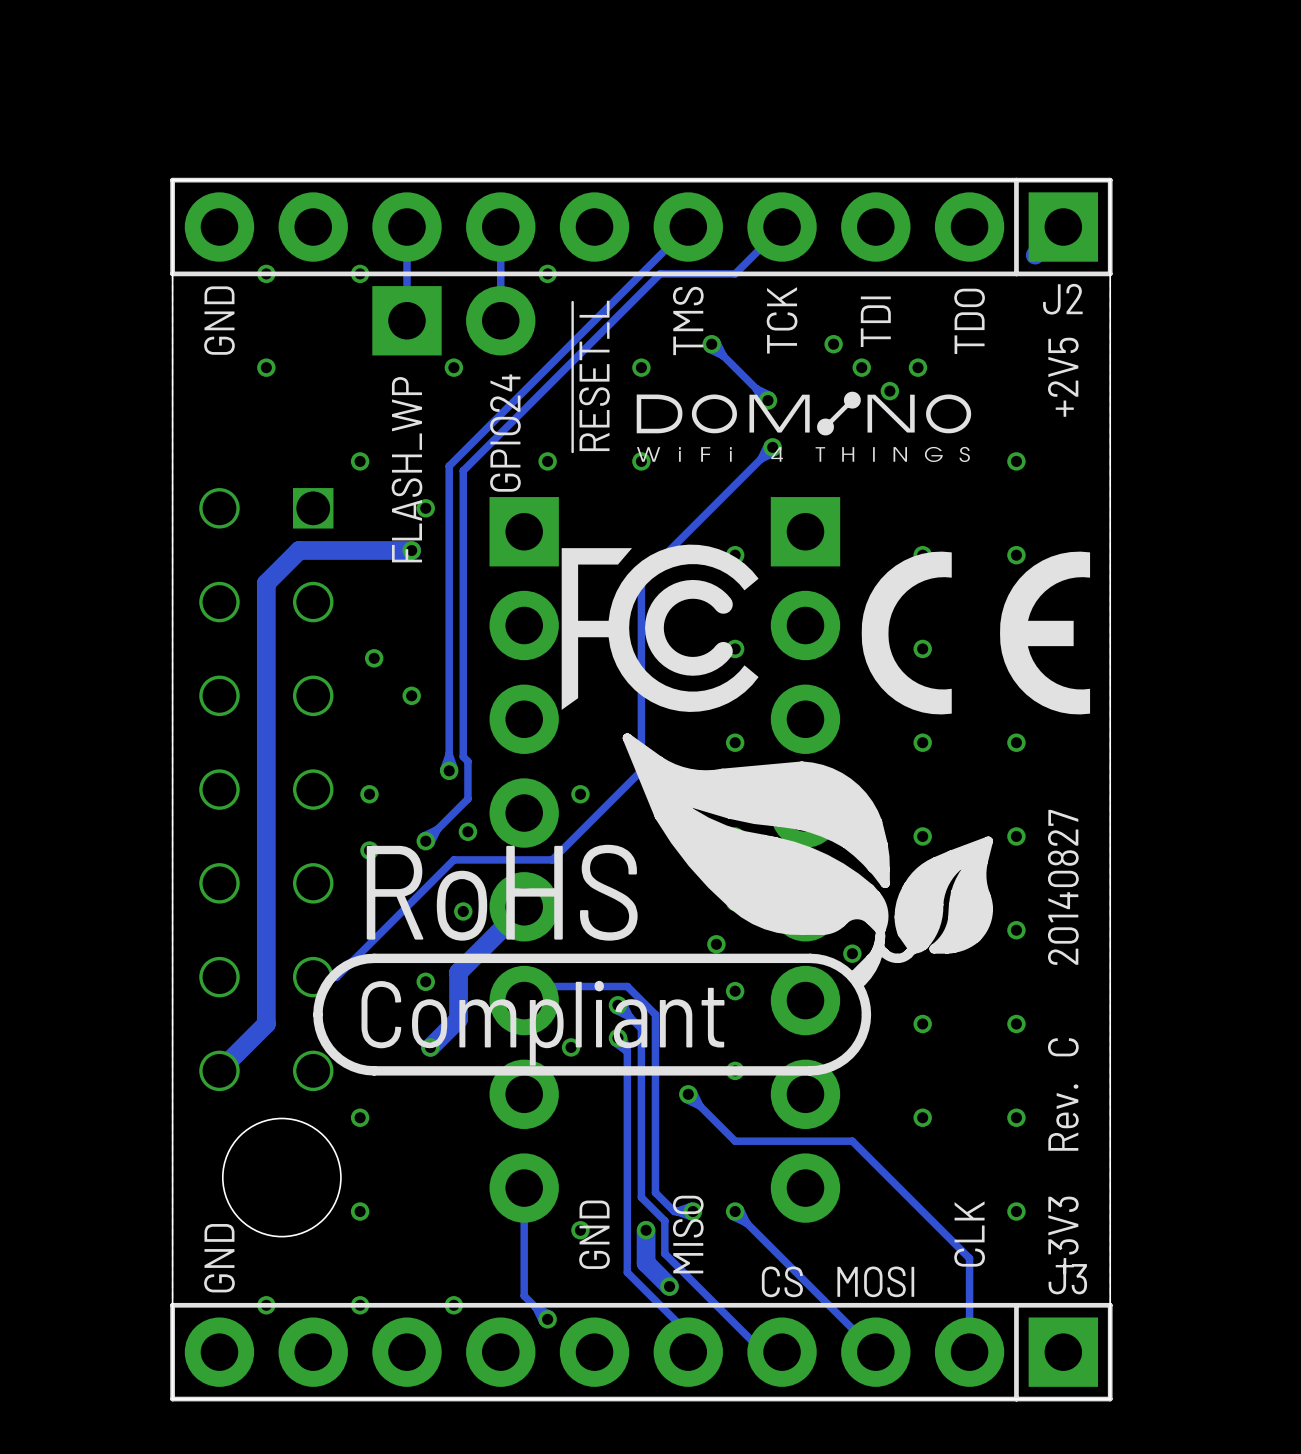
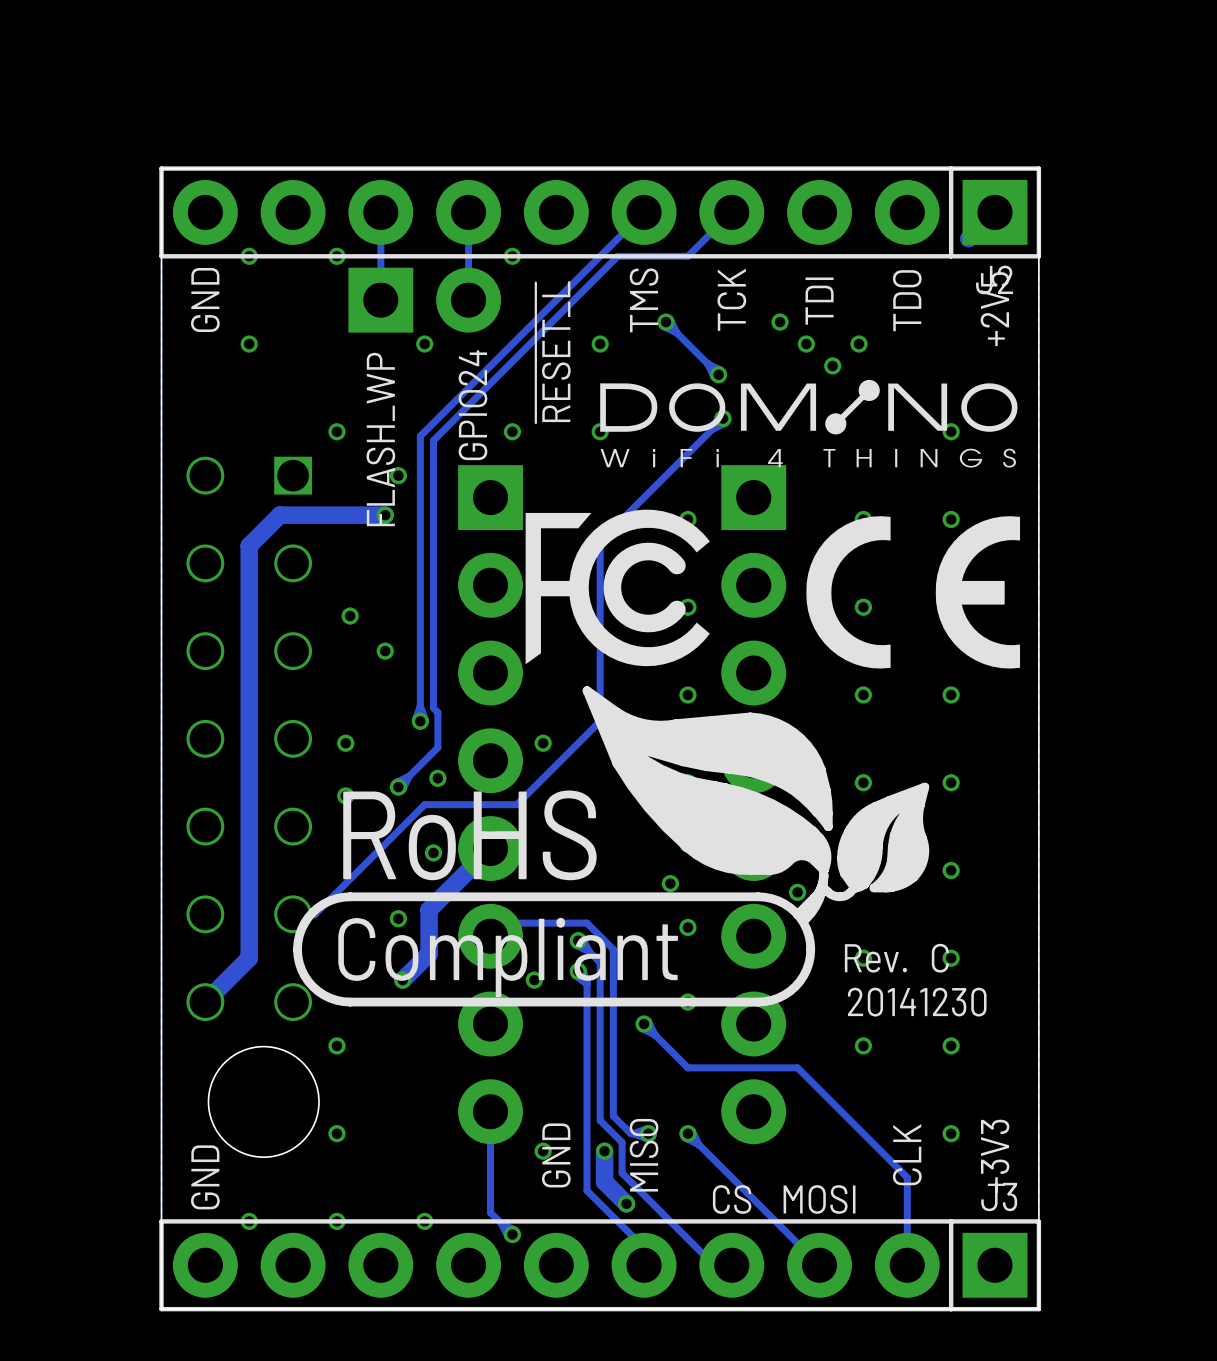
text position: +2V5 (1063, 377) -> +2V5 (994, 309)
drawing: [636, 391, 972, 463] -> none
drawing: none -> [600, 379, 1018, 468]
text: 20140827 (1063, 887) -> none
text rotation: 0° (1063, 1047) -> 90° clockwise (940, 958)
text: none -> 20141230 (917, 1002)
text rotation: 0° (1063, 1117) -> 90° clockwise (875, 958)
text position: Rev. (1063, 1117) -> Rev. (875, 958)

